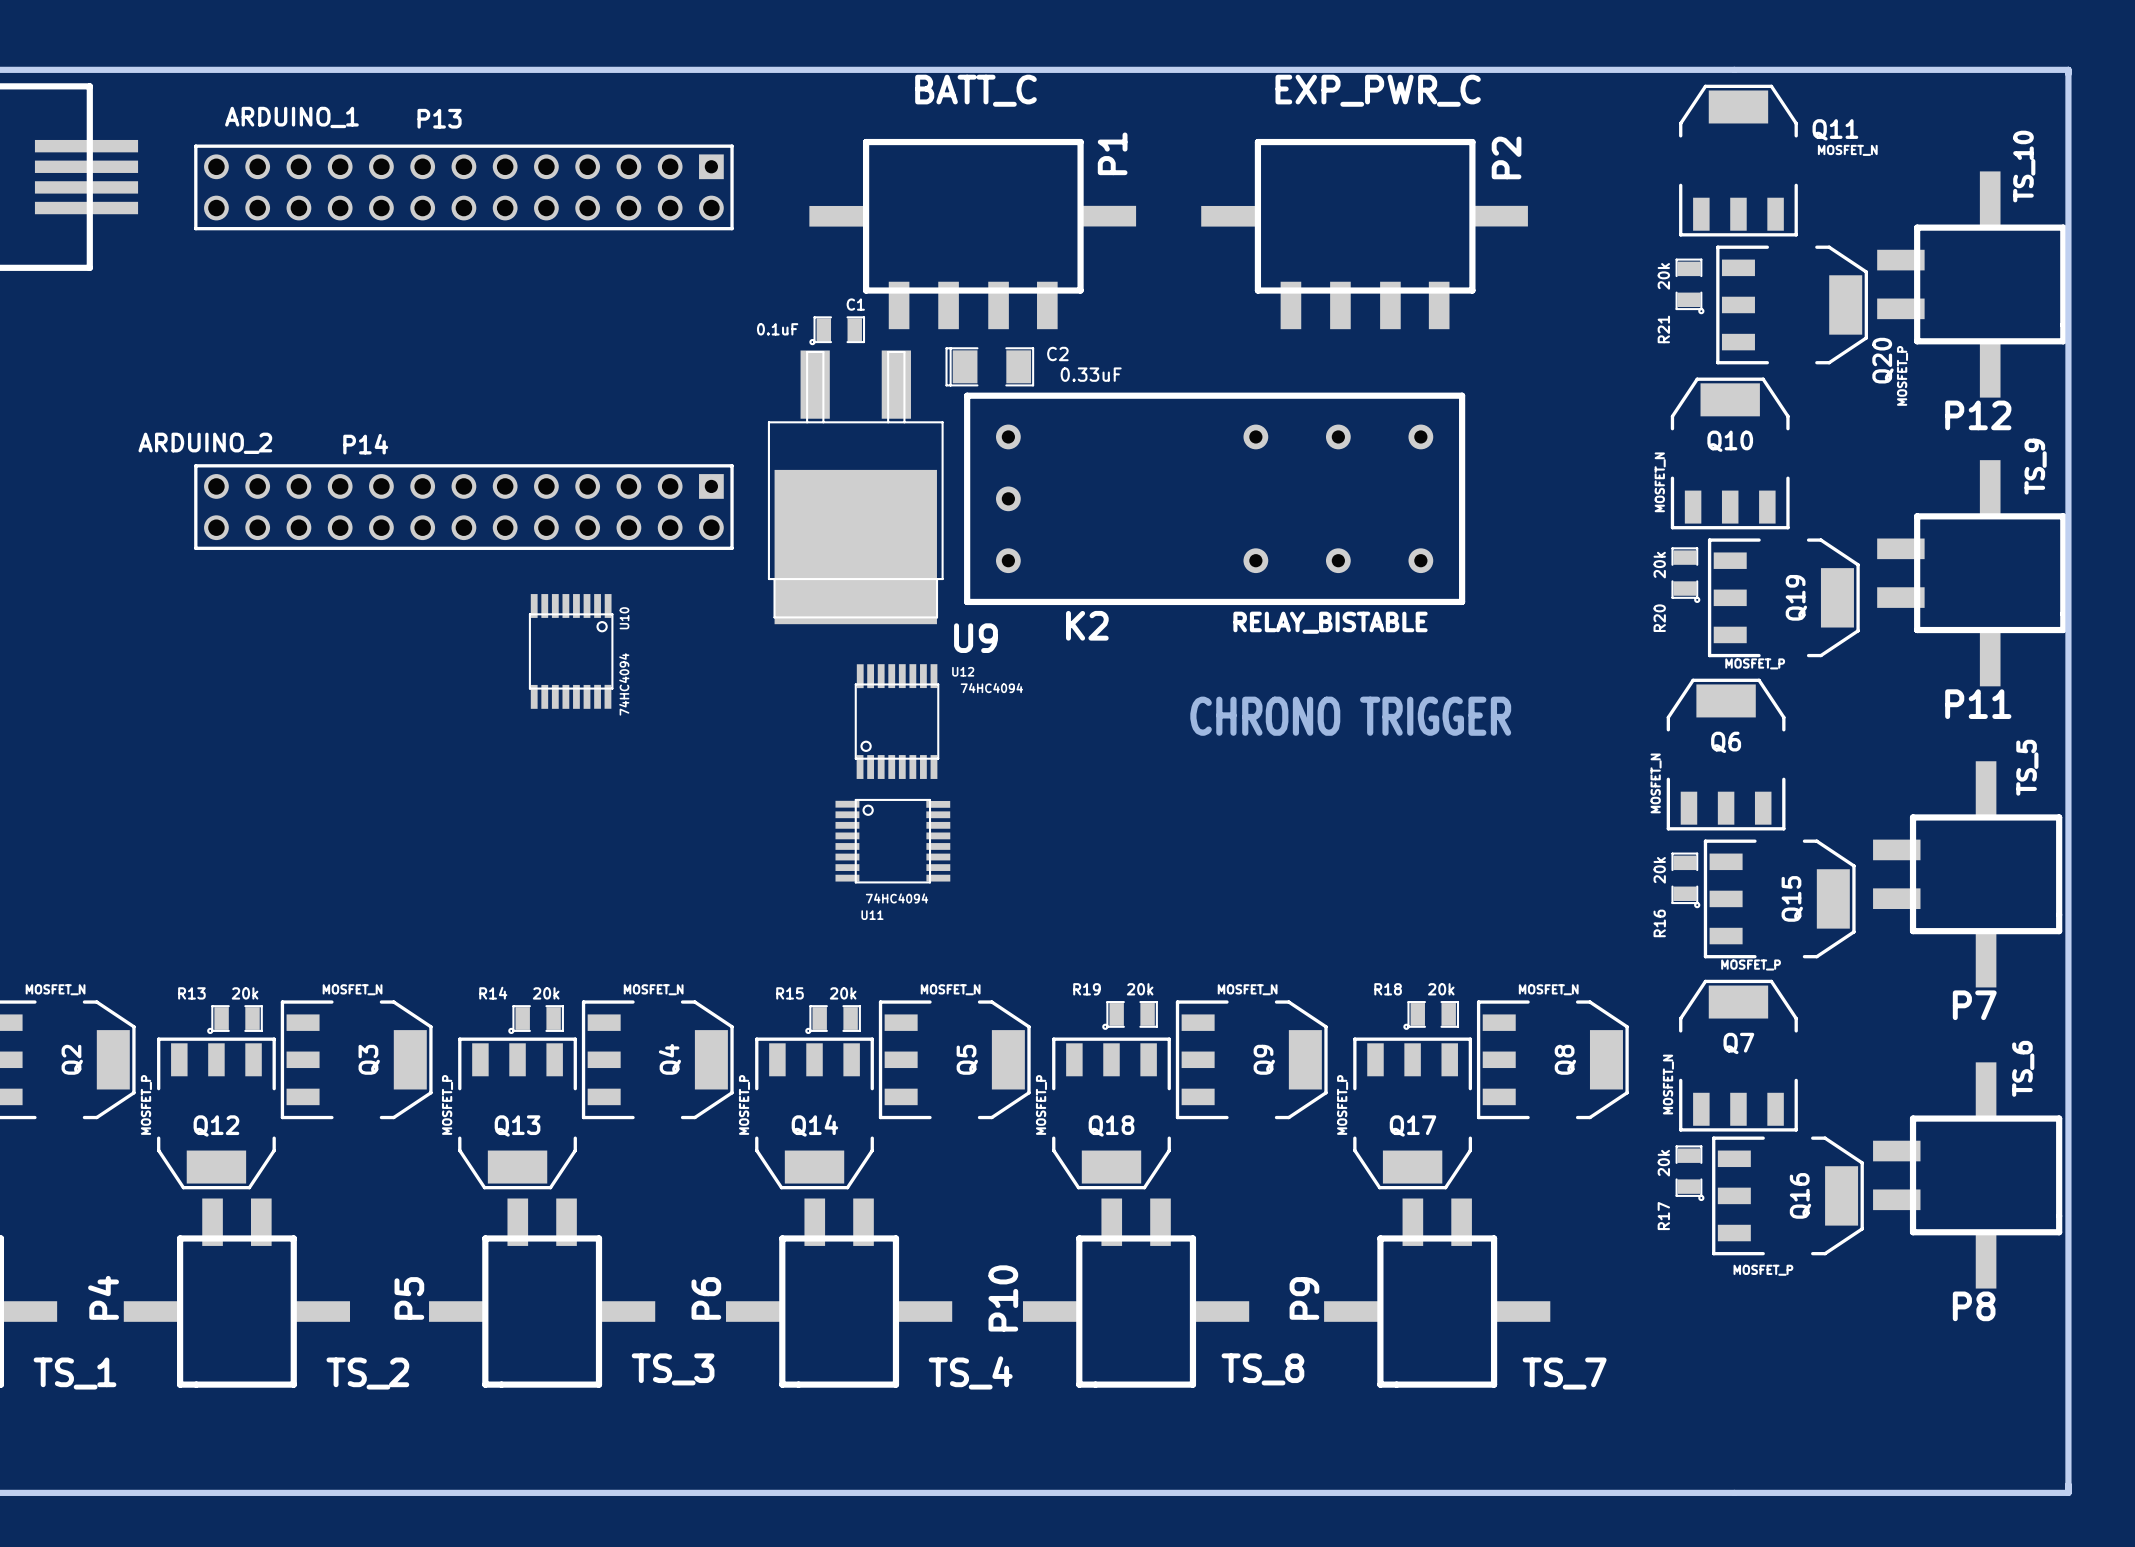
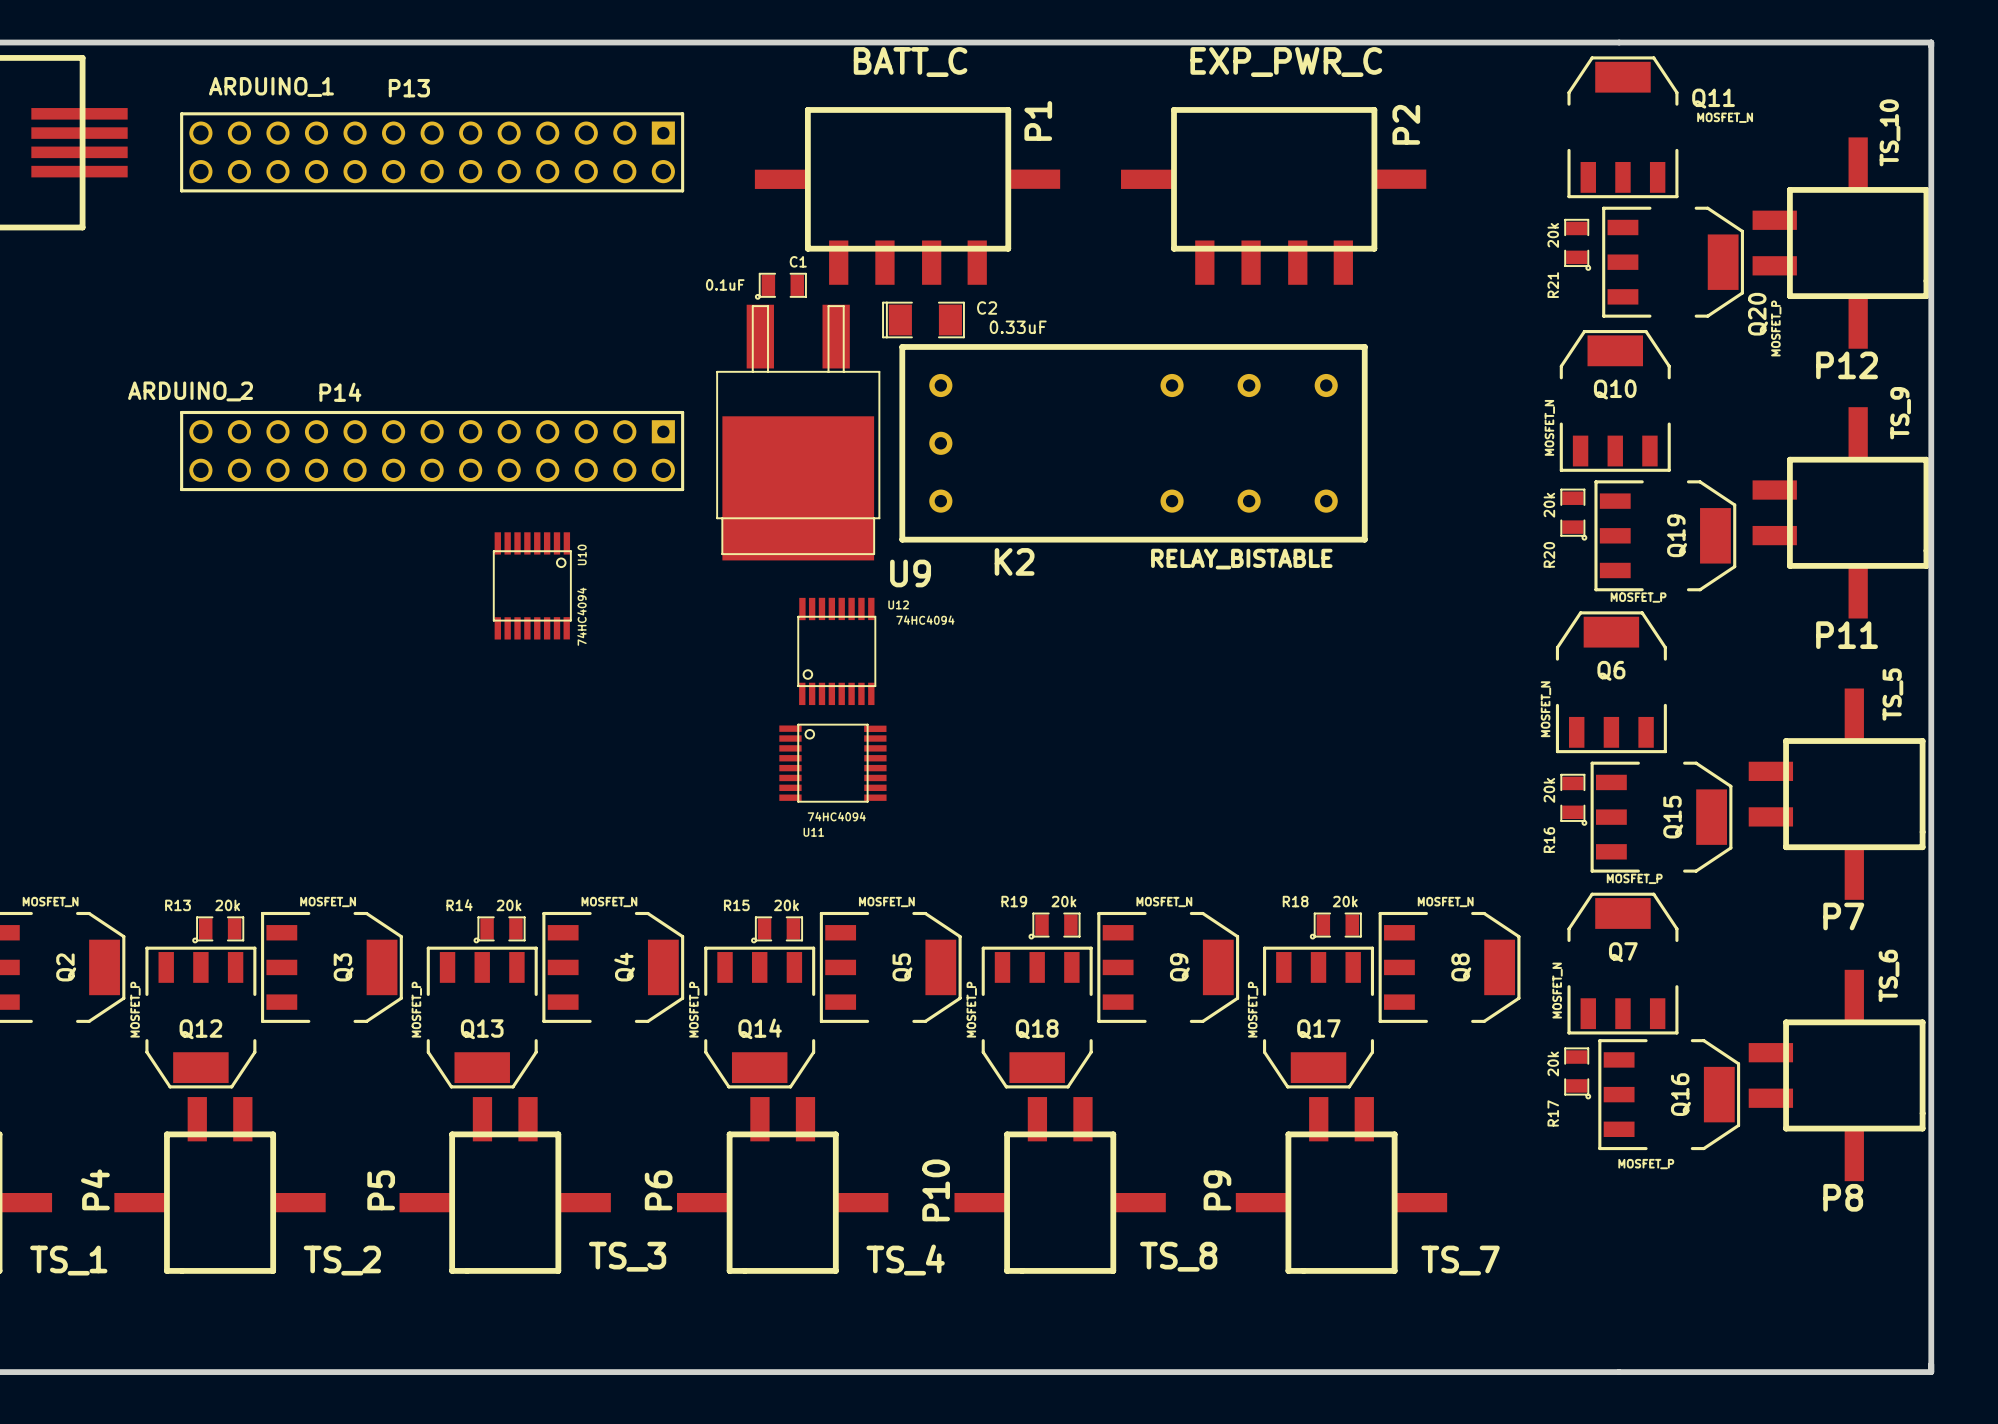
text: CHRONO TRIGGER (1350, 716) -> none

